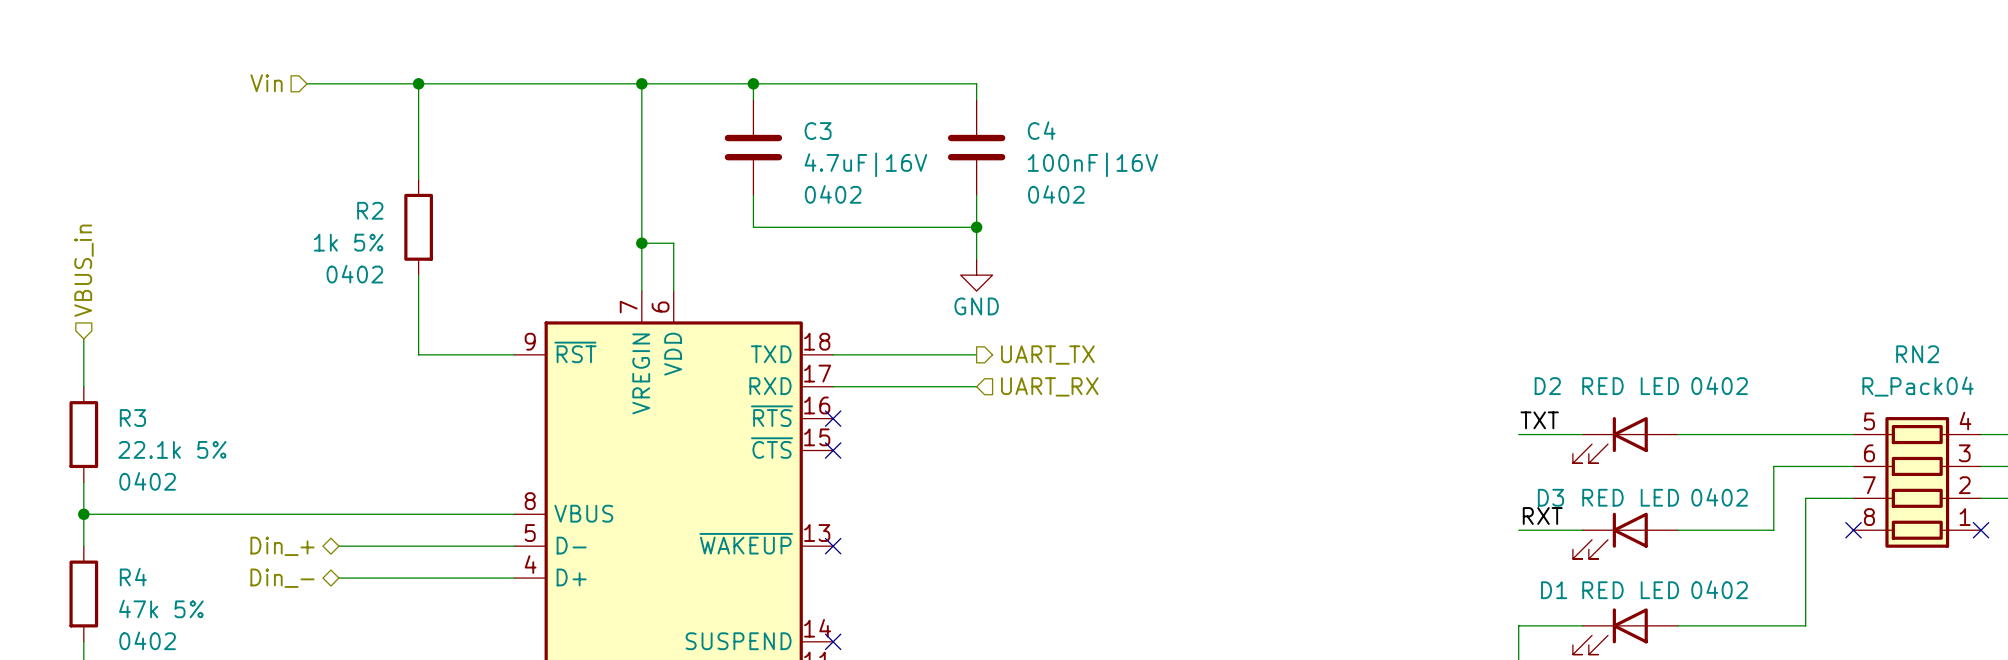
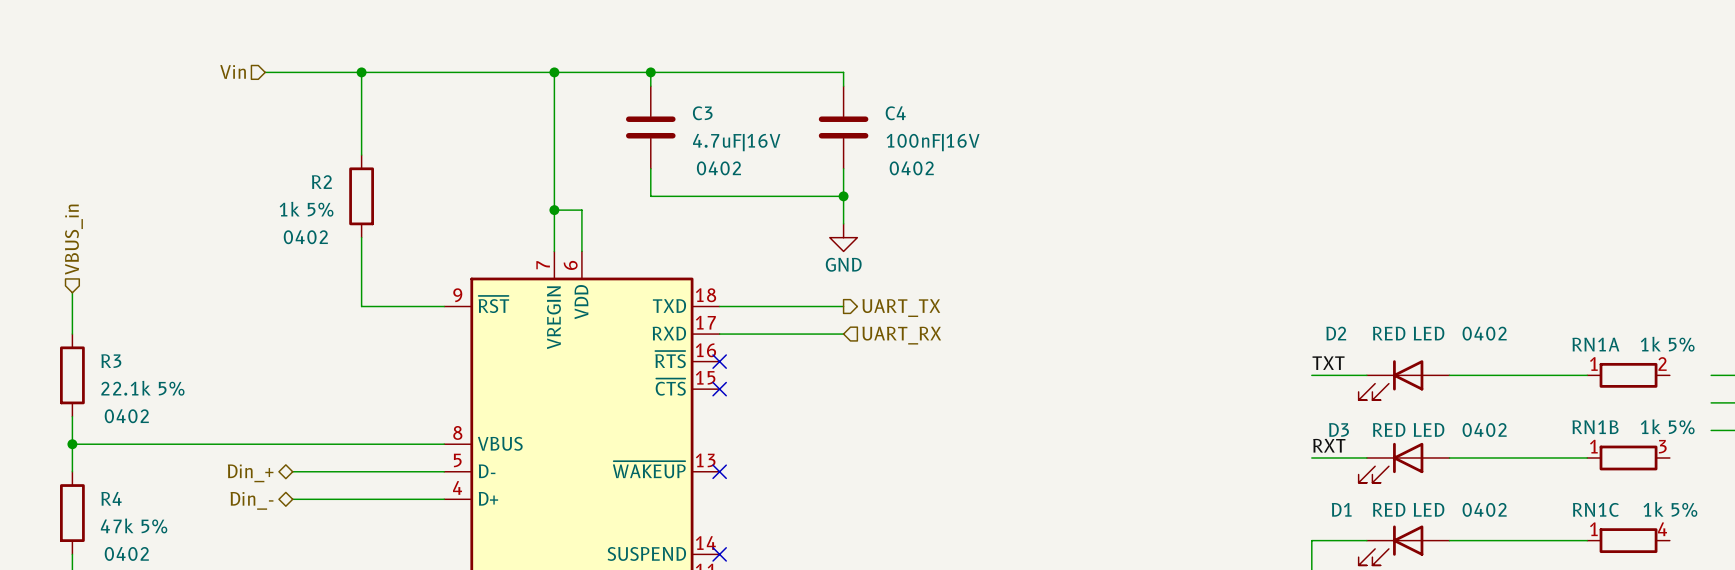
RN1A: none -> 1k 5% (1628, 375)
wire: (1853, 466) (1773, 466) (1773, 530) -> (1587, 457) (1532, 457)
RN2: R_Pack04 (1917, 482) -> none
wire: (1853, 498) (1805, 498) (1805, 625) -> (1587, 540) (1559, 540)
no-connect mark: (1853, 530) -> none
RN1B: none -> 1k 5% (1628, 457)
no-connect mark: (1981, 530) -> none
RN1C: none -> 1k 5% (1628, 540)

